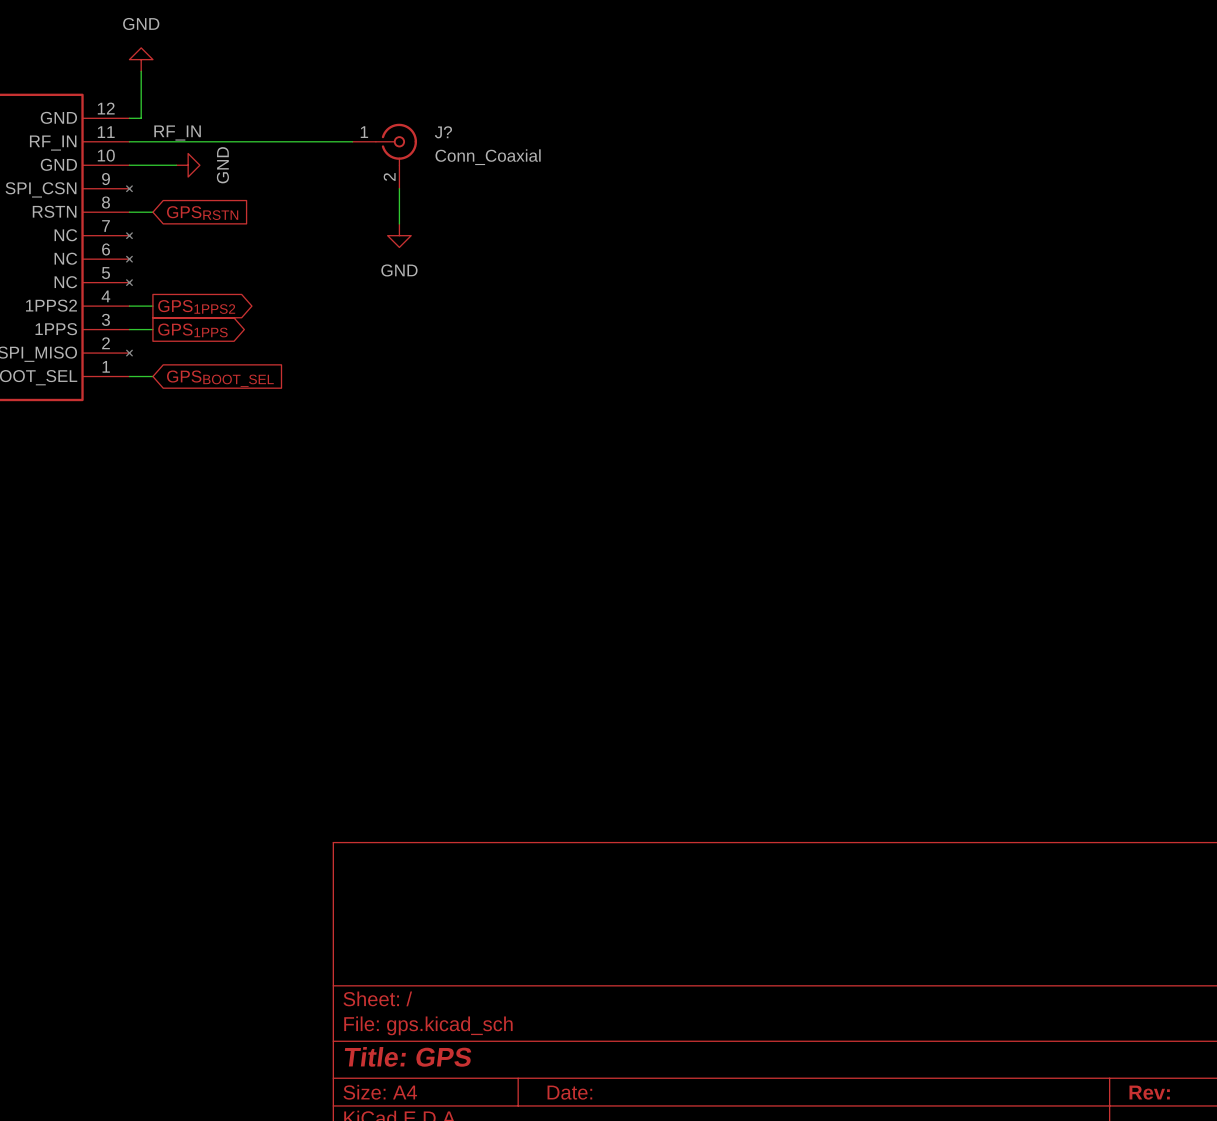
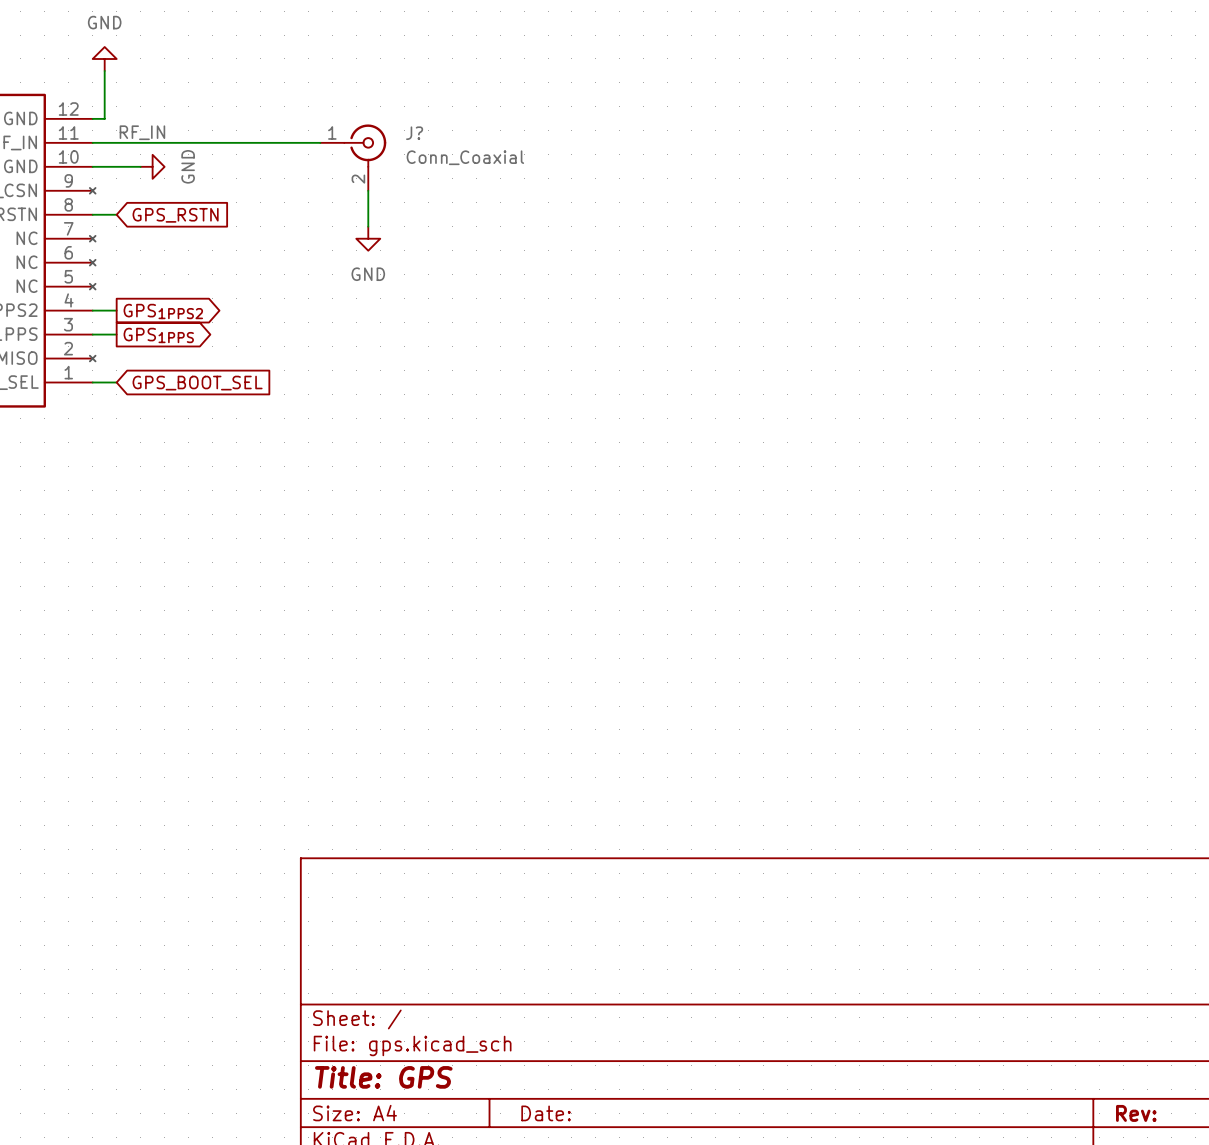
global label: GPSRSTN (202, 213) -> GPS_RSTN (175, 215)
global label: GPSBOOT_SEL (220, 378) -> GPS_BOOT_SEL (197, 383)

